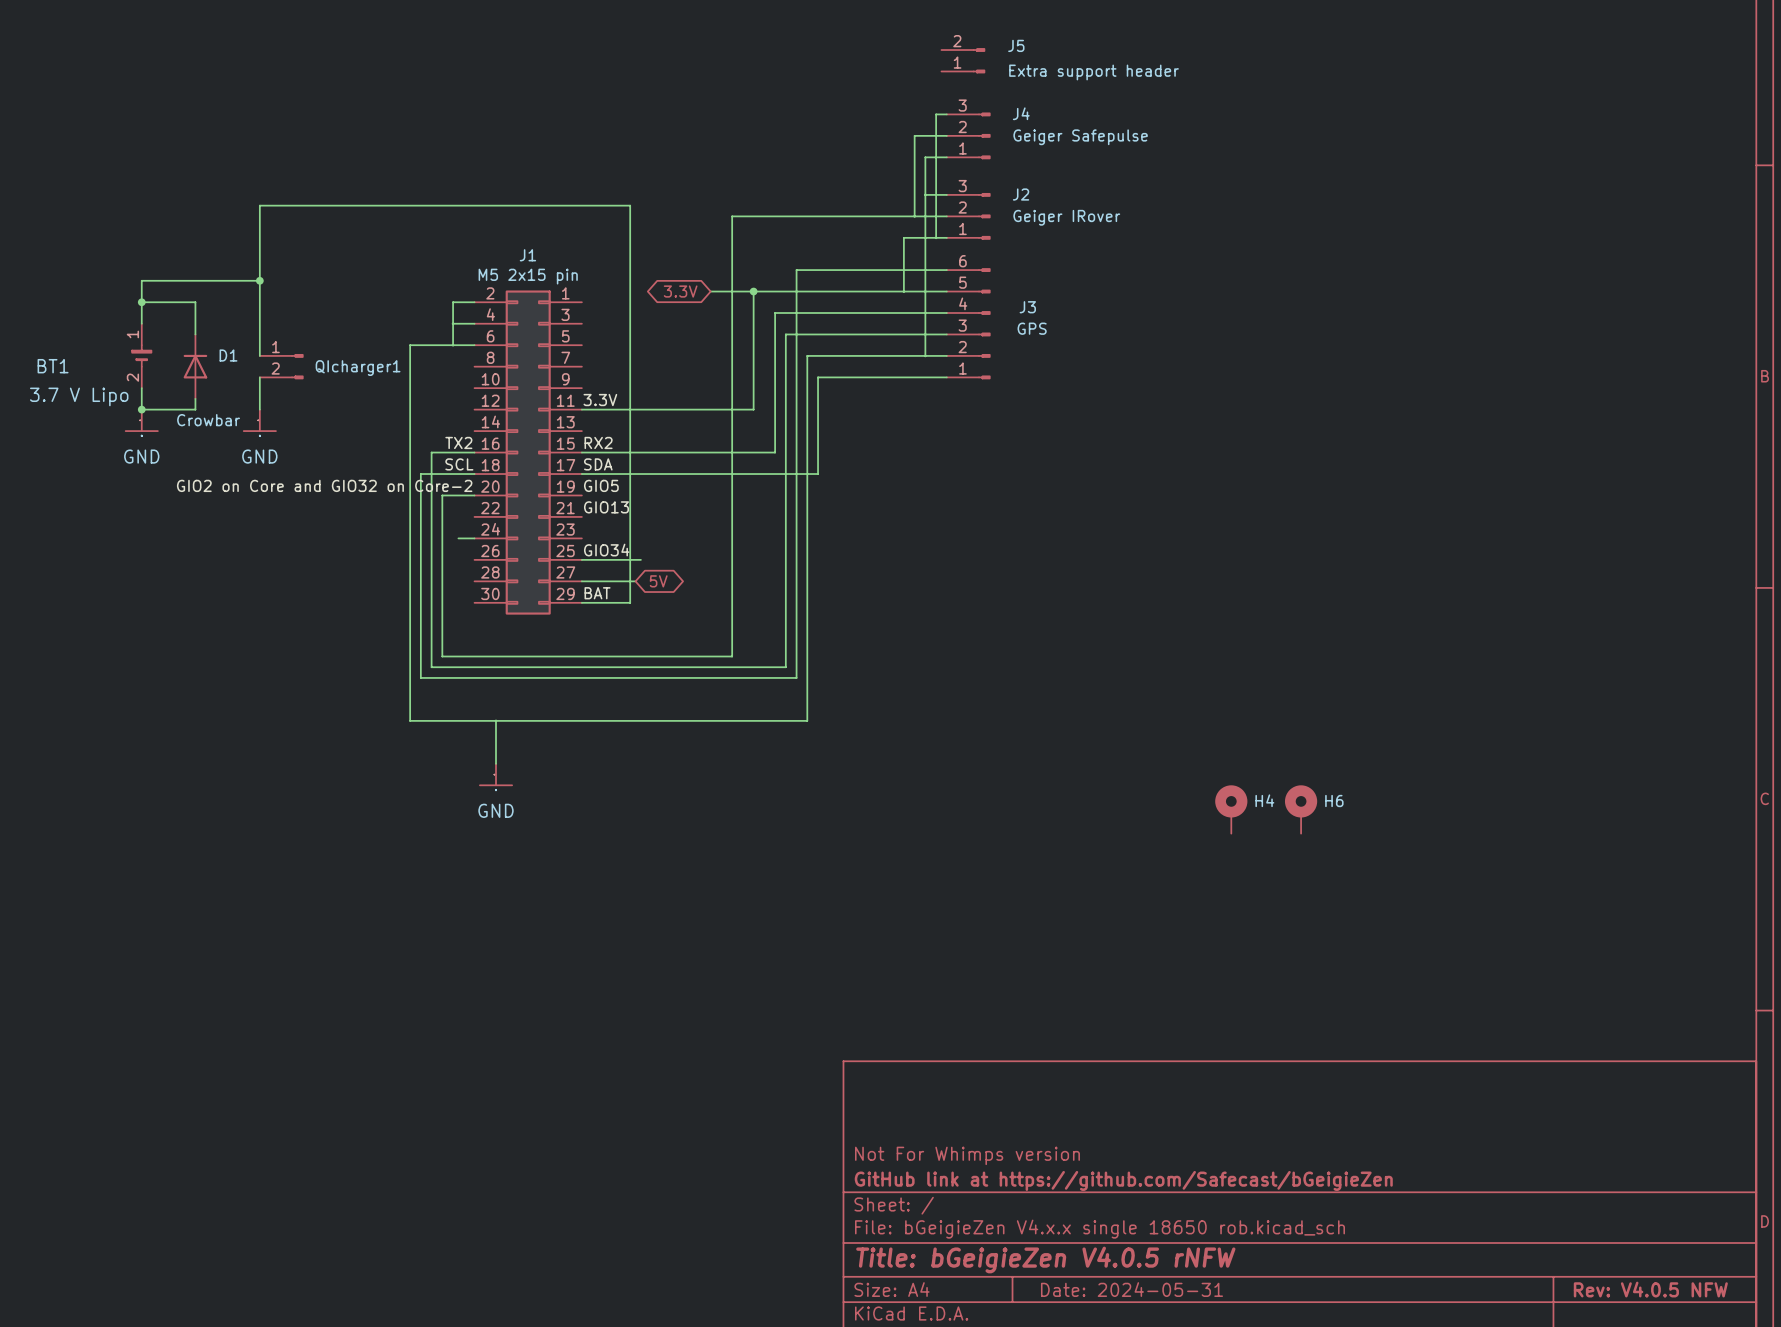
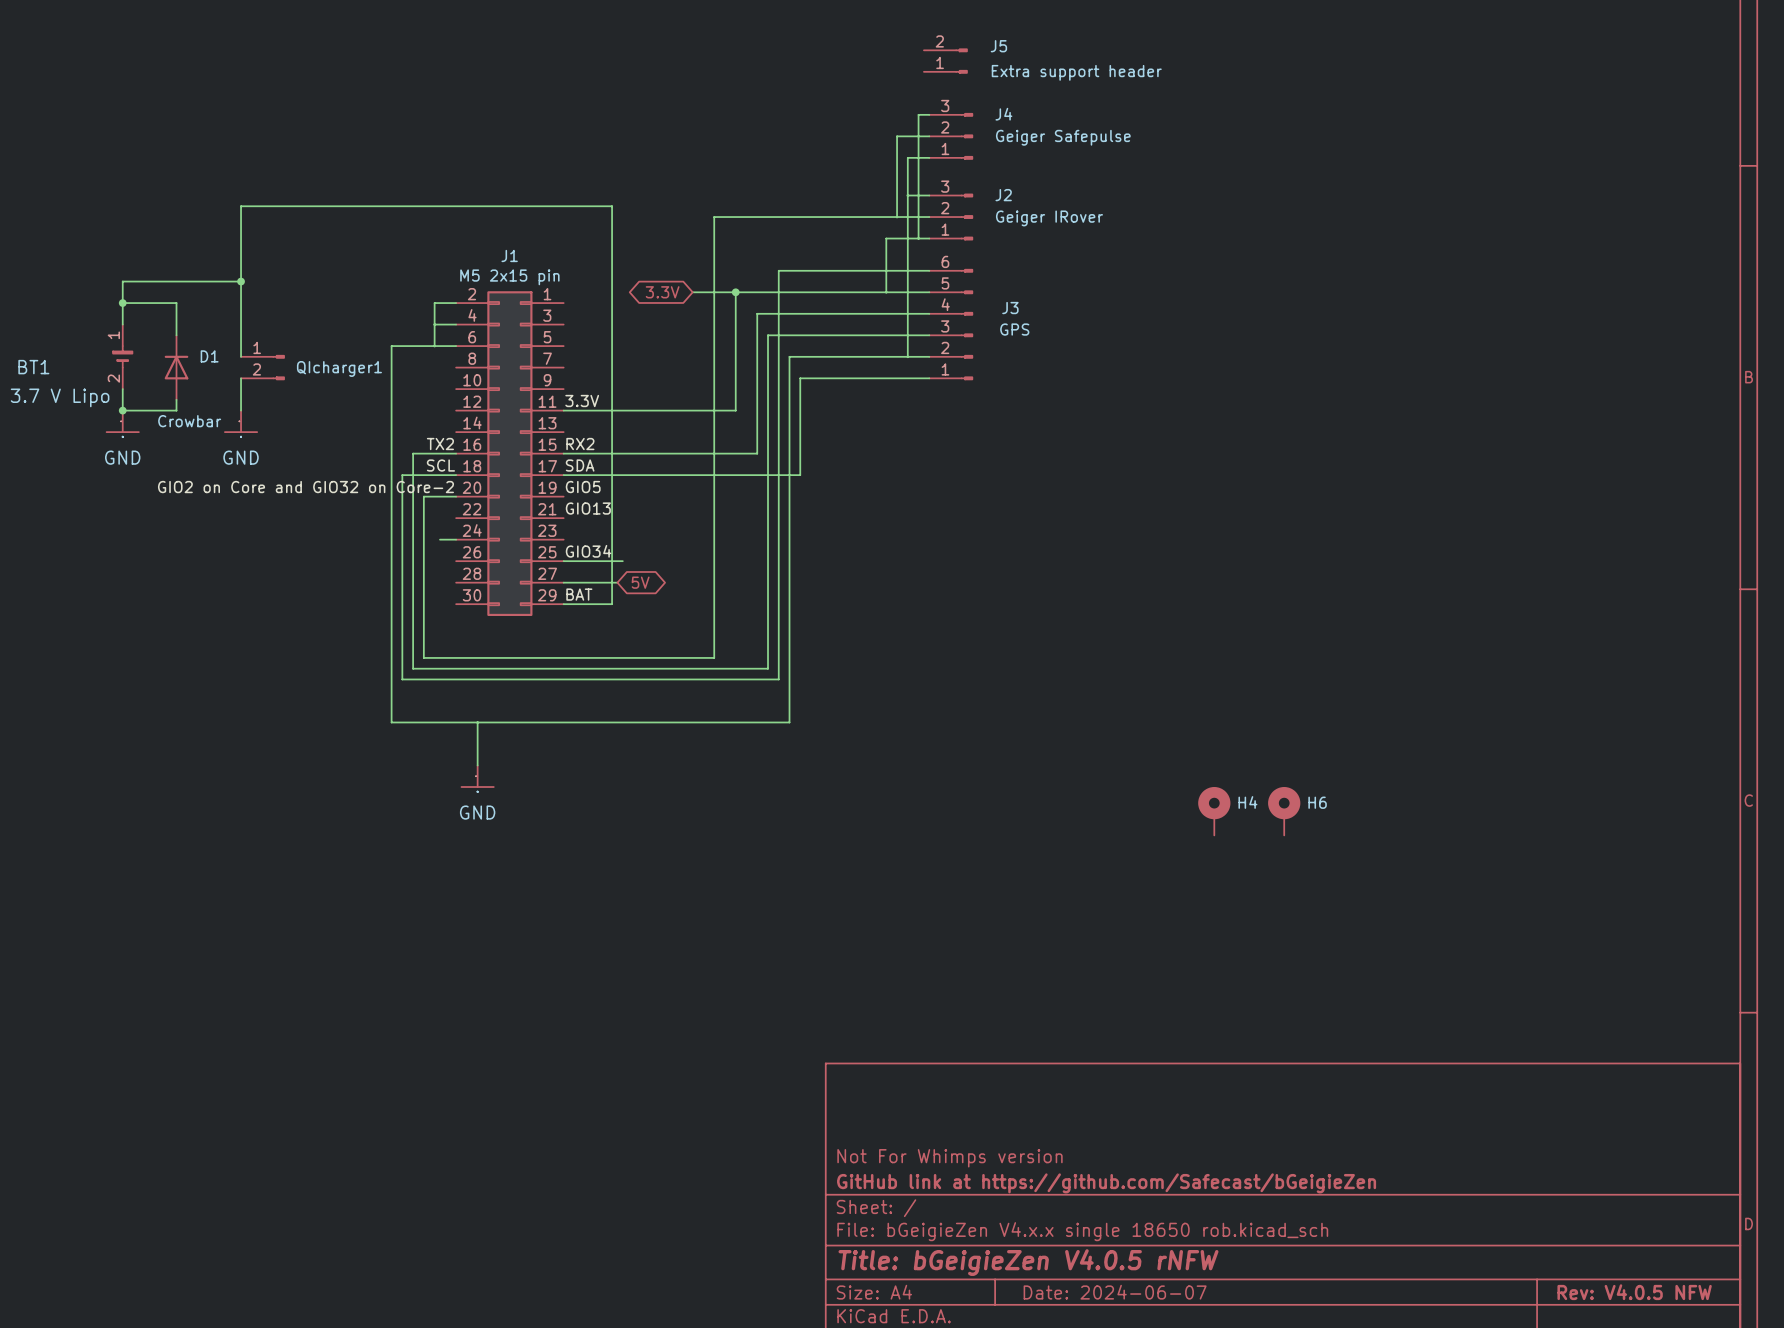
title block: Date: 2024-05-31 (1132, 1289) -> Date: 2024-06-07 (1115, 1292)

